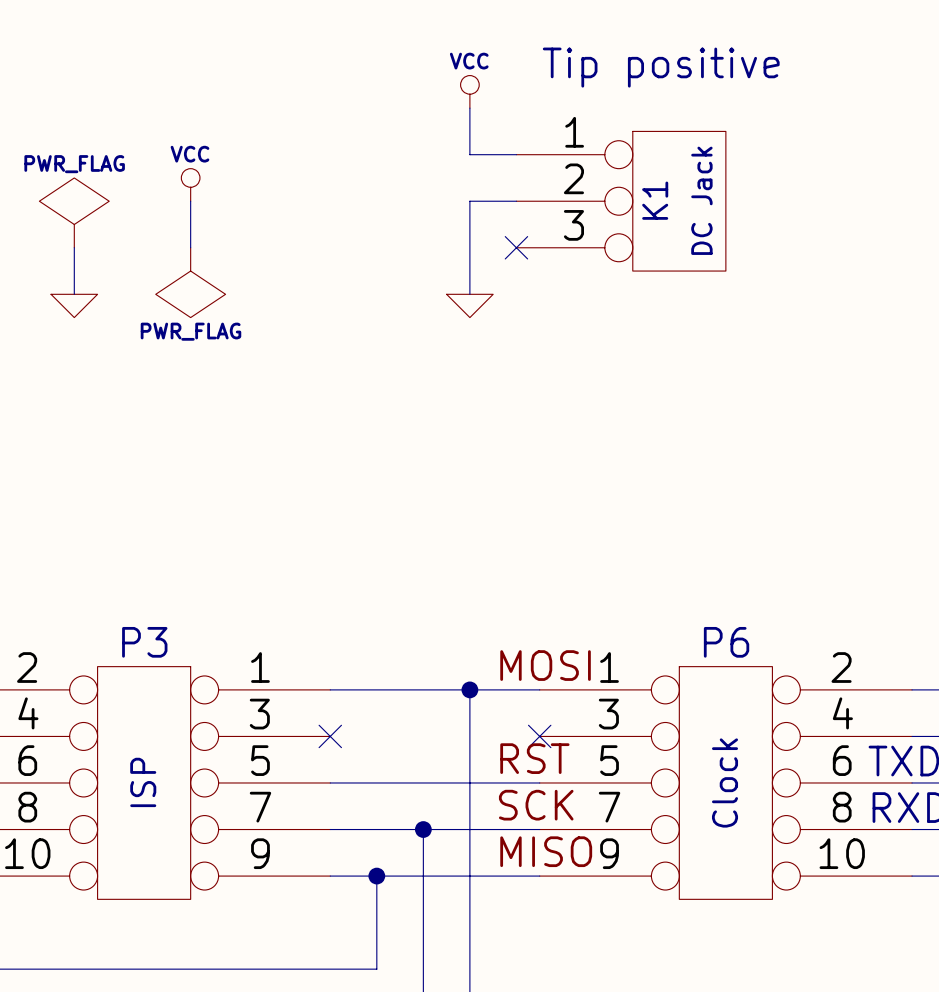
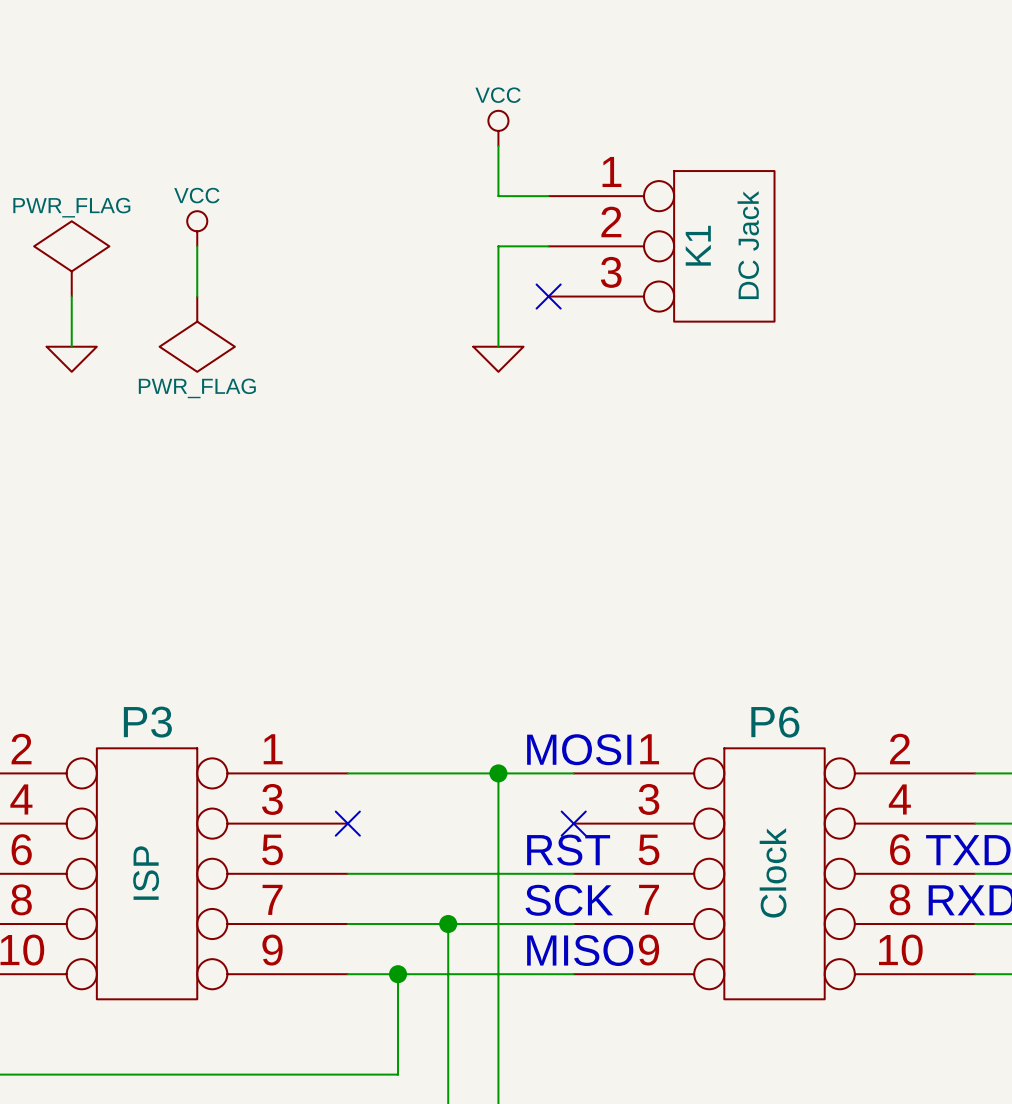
text: Tip positive (661, 67) -> none
label: MOSI (545, 665) -> none
text: none -> MOSI (579, 749)
label: RST (534, 758) -> none
text: none -> RST (568, 850)
label: SCK (536, 805) -> none
text: none -> SCK (569, 900)
label: MISO (546, 851) -> none
text: none -> MISO (580, 950)

